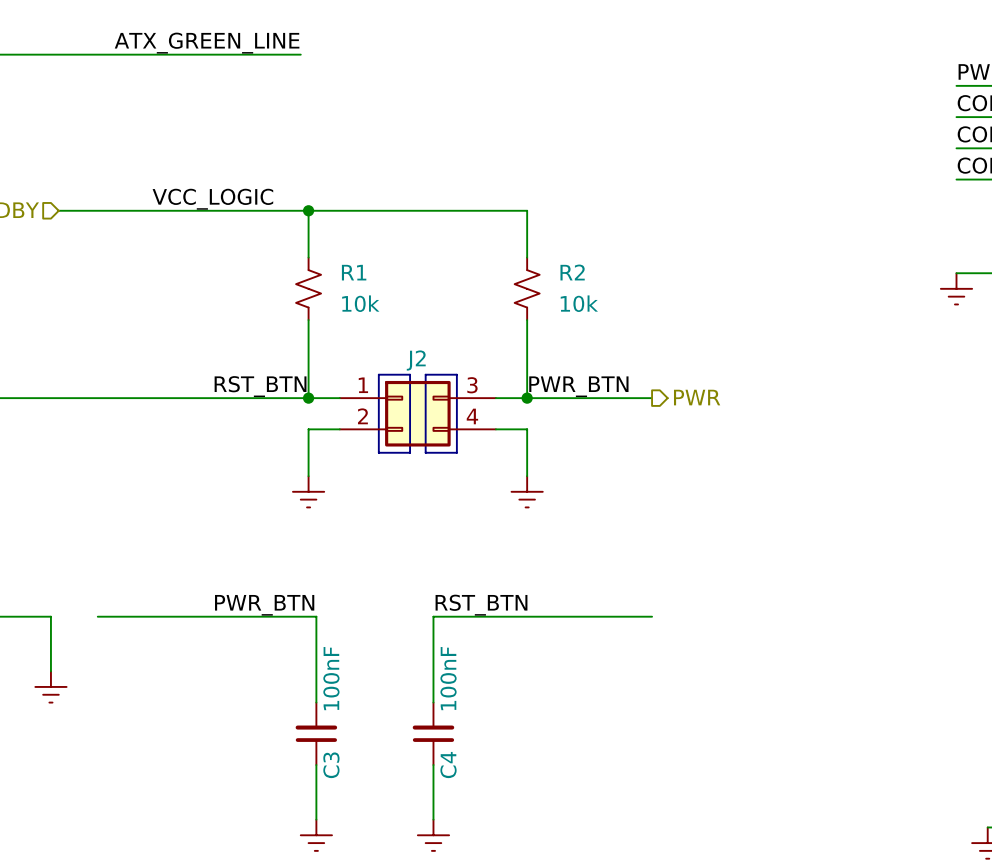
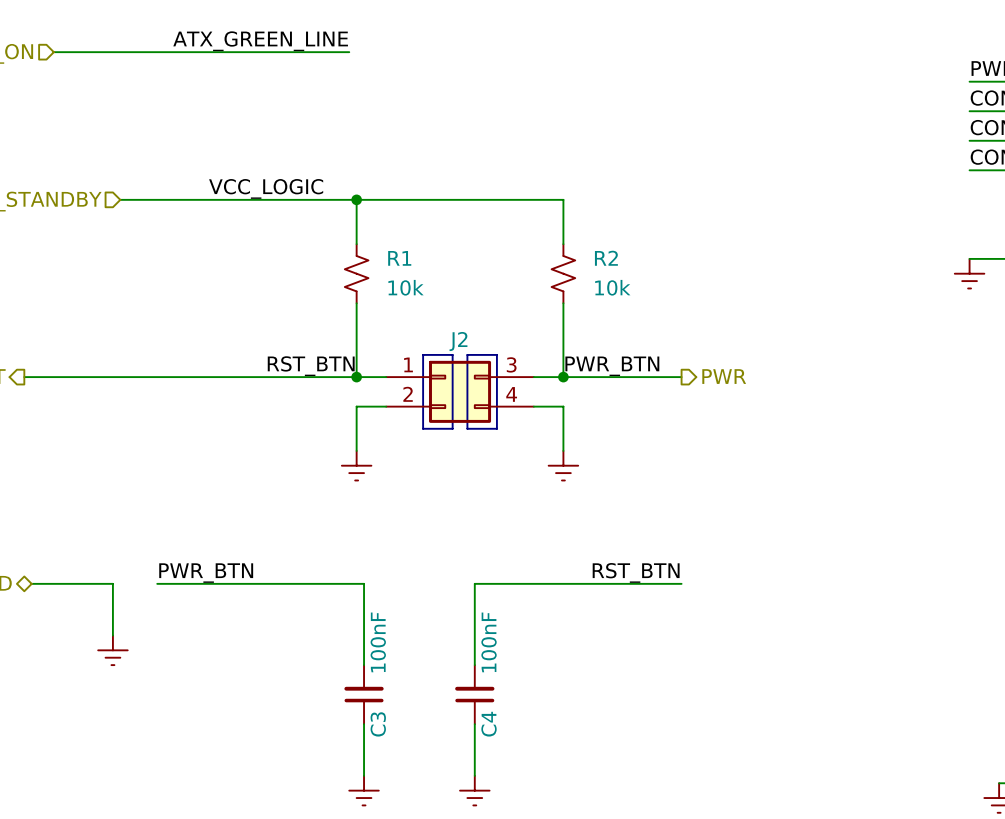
label position: PWR_BTN (264, 605) -> PWR_BTN (206, 573)
label position: RST_BTN (481, 605) -> RST_BTN (636, 572)

